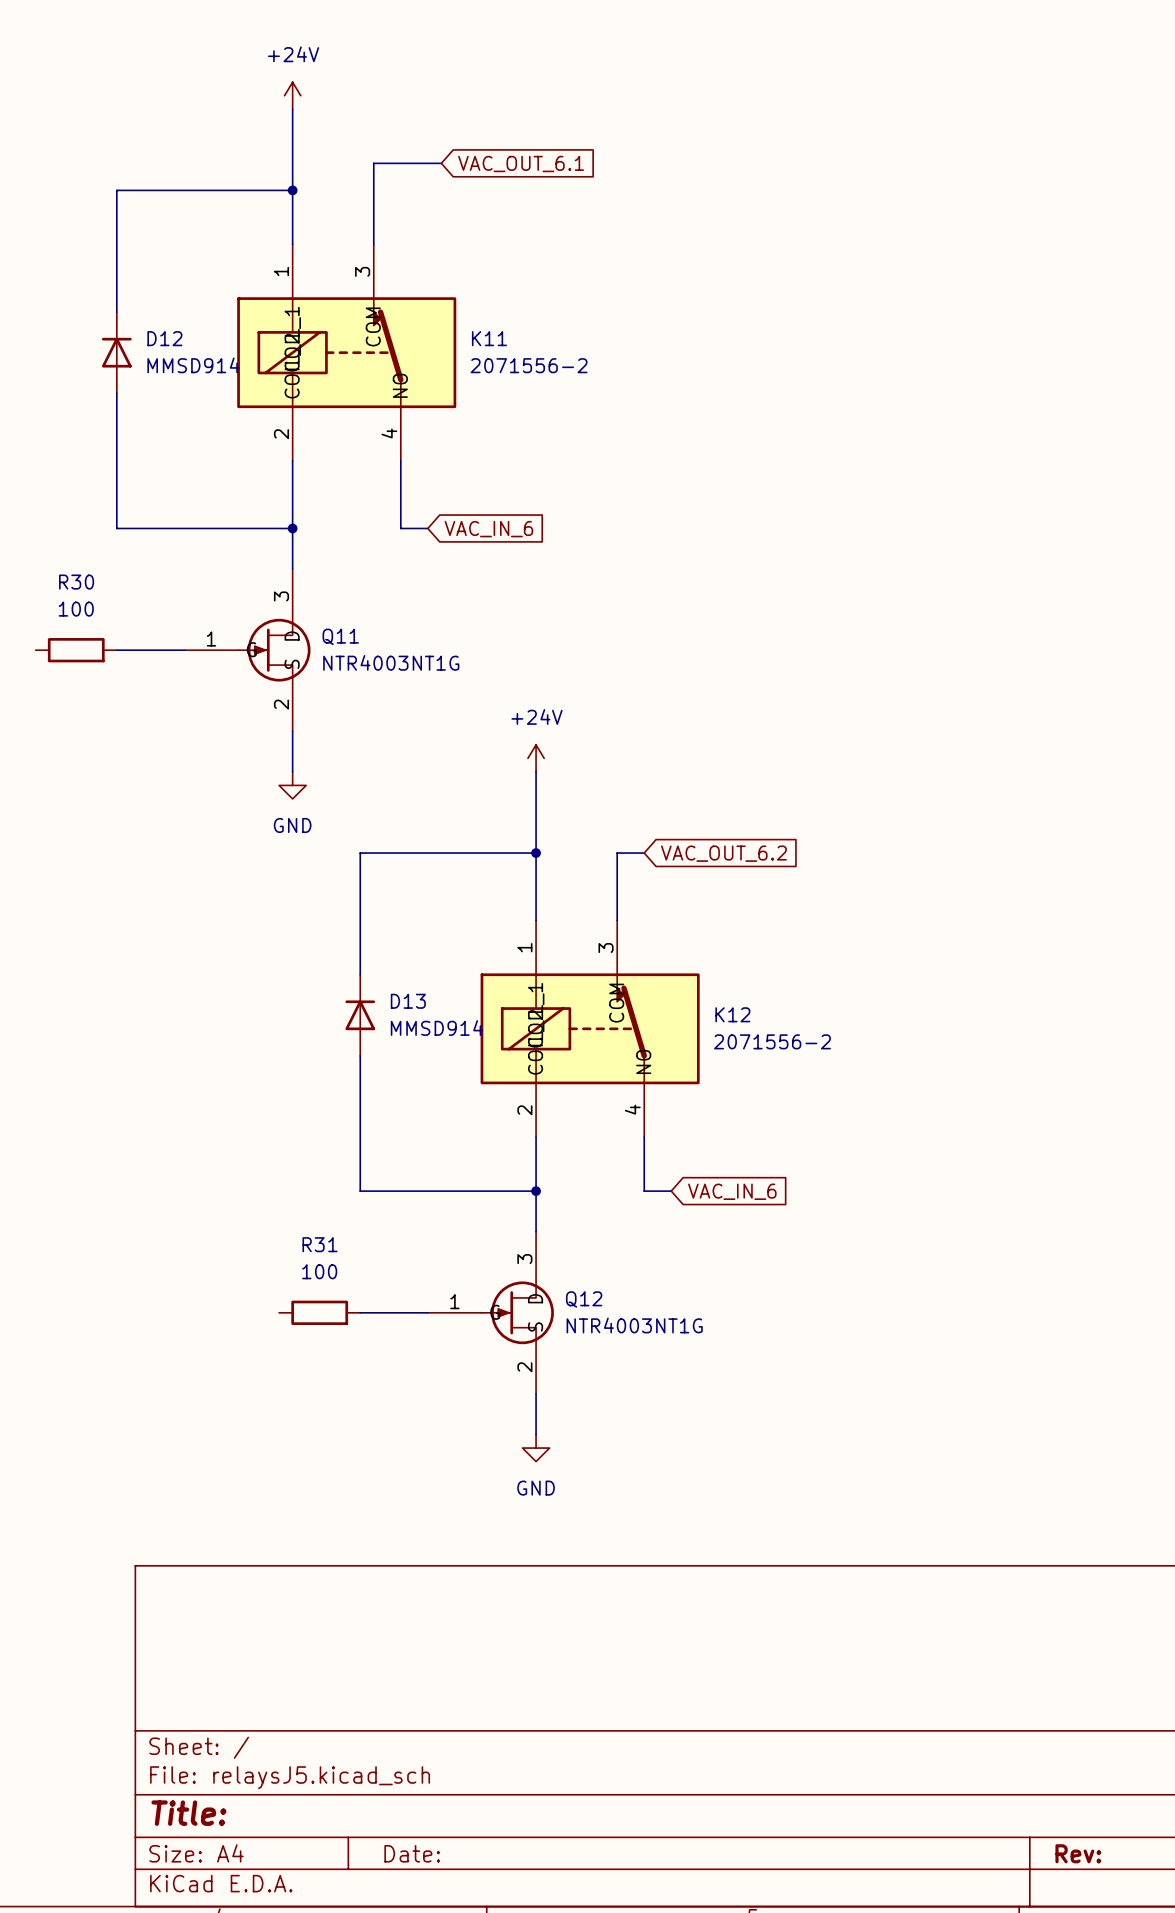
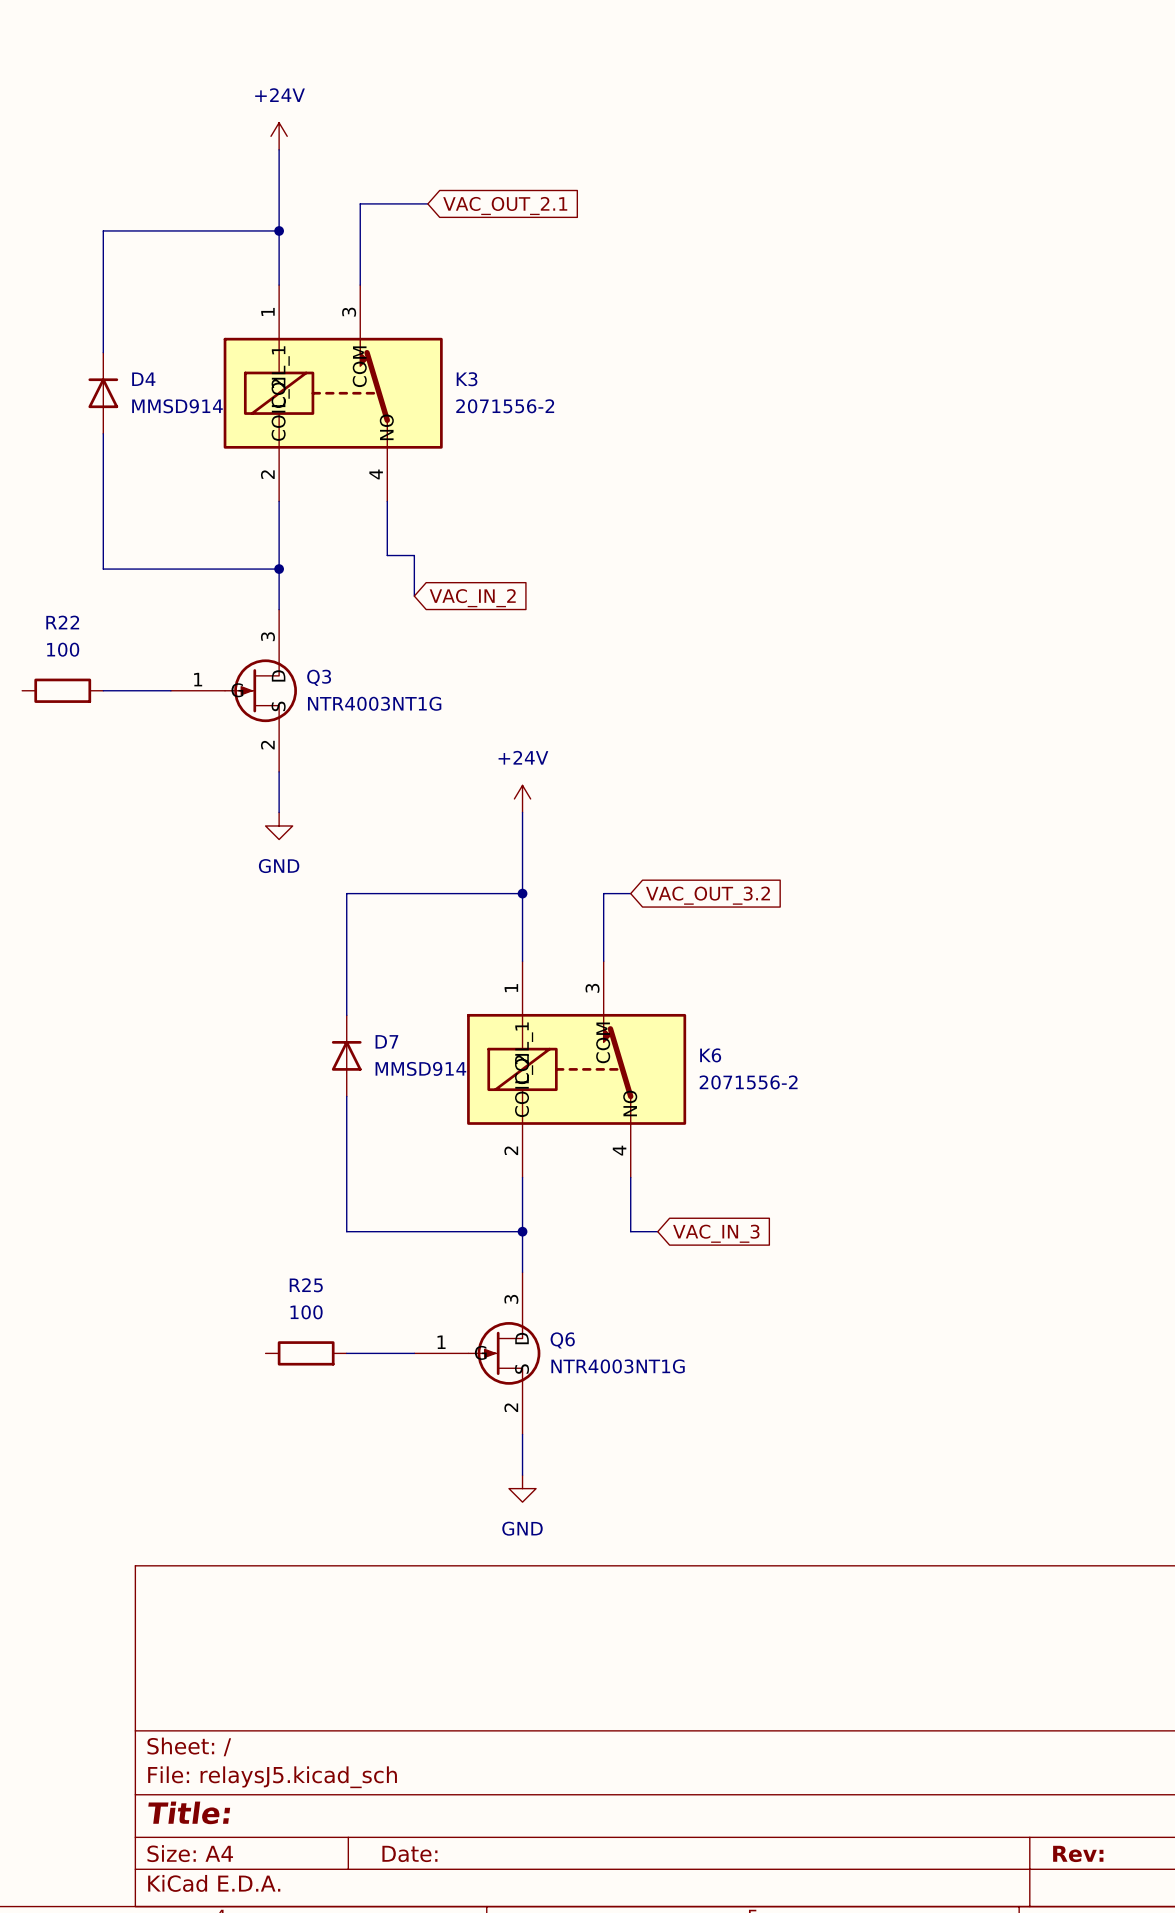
power symbol position: +24V (292, 95) -> +24V (279, 136)
wire: (292, 109) (292, 244) -> (279, 149) (279, 285)
wire: (441, 163) (373, 163) (373, 244) -> (427, 203) (360, 203) (360, 285)
global label: VAC_OUT_6.1 (521, 164) -> none
wire: (292, 190) (116, 190) (116, 312) -> (279, 230) (103, 230) (103, 352)
junction position: (292, 190) -> (279, 230)
global label: none -> VAC_OUT_2.1 (505, 205)
D12: MMSD914 (116, 352) -> none
K11: 2071556-2 (346, 352) -> none
D4: none -> MMSD914 (103, 393)
wire: (116, 393) (116, 528) (292, 528) -> (103, 433) (103, 569) (279, 569)
K3: none -> 2071556-2 (333, 393)
wire: (292, 460) (292, 569) -> (279, 501) (279, 609)
wire: (400, 460) (400, 528) (427, 528) -> none
wire: none -> (387, 501) (387, 555) (414, 555) (414, 596)
junction position: (292, 528) -> (279, 569)
global label: VAC_IN_6 (488, 529) -> none
global label: none -> VAC_IN_2 (472, 598)
R30: 100 (76, 650) -> none
wire: (116, 650) (184, 650) -> (103, 690) (170, 690)
Q11: NTR4003NT1G (247, 650) -> none
R22: none -> 100 (62, 690)
Q3: none -> NTR4003NT1G (233, 690)
wire: (292, 731) (292, 771) -> (279, 771) (279, 812)
power symbol position: +24V (536, 758) -> +24V (522, 798)
wire: (536, 771) (536, 920) -> (522, 812) (522, 961)
power symbol position: GND (292, 785) -> GND (279, 825)
wire: (536, 853) (360, 853) (360, 974) -> (522, 893) (346, 893) (346, 1015)
junction position: (536, 853) -> (522, 893)
wire: (644, 853) (617, 853) (617, 920) -> (630, 893) (603, 893) (603, 961)
global label: VAC_OUT_6.2 (723, 853) -> none
global label: none -> VAC_OUT_3.2 (708, 895)
D13: MMSD914 (360, 1015) -> none
K12: 2071556-2 (590, 1028) -> none
D7: none -> MMSD914 (346, 1055)
wire: (360, 1055) (360, 1191) (536, 1191) -> (346, 1096) (346, 1231) (522, 1231)
K6: none -> 2071556-2 (576, 1069)
wire: (536, 1137) (536, 1231) -> (522, 1177) (522, 1272)
wire: (644, 1137) (644, 1191) (671, 1191) -> (630, 1177) (630, 1231) (657, 1231)
junction position: (536, 1191) -> (522, 1231)
global label: VAC_IN_6 (732, 1191) -> none
global label: none -> VAC_IN_3 (716, 1233)
R31: 100 (319, 1312) -> none
wire: (360, 1312) (427, 1312) -> (346, 1353) (414, 1353)
Q12: NTR4003NT1G (490, 1312) -> none
R25: none -> 100 (306, 1353)
Q6: none -> NTR4003NT1G (477, 1353)
wire: (536, 1393) (536, 1434) -> (522, 1434) (522, 1475)
power symbol position: GND (536, 1448) -> GND (522, 1488)

